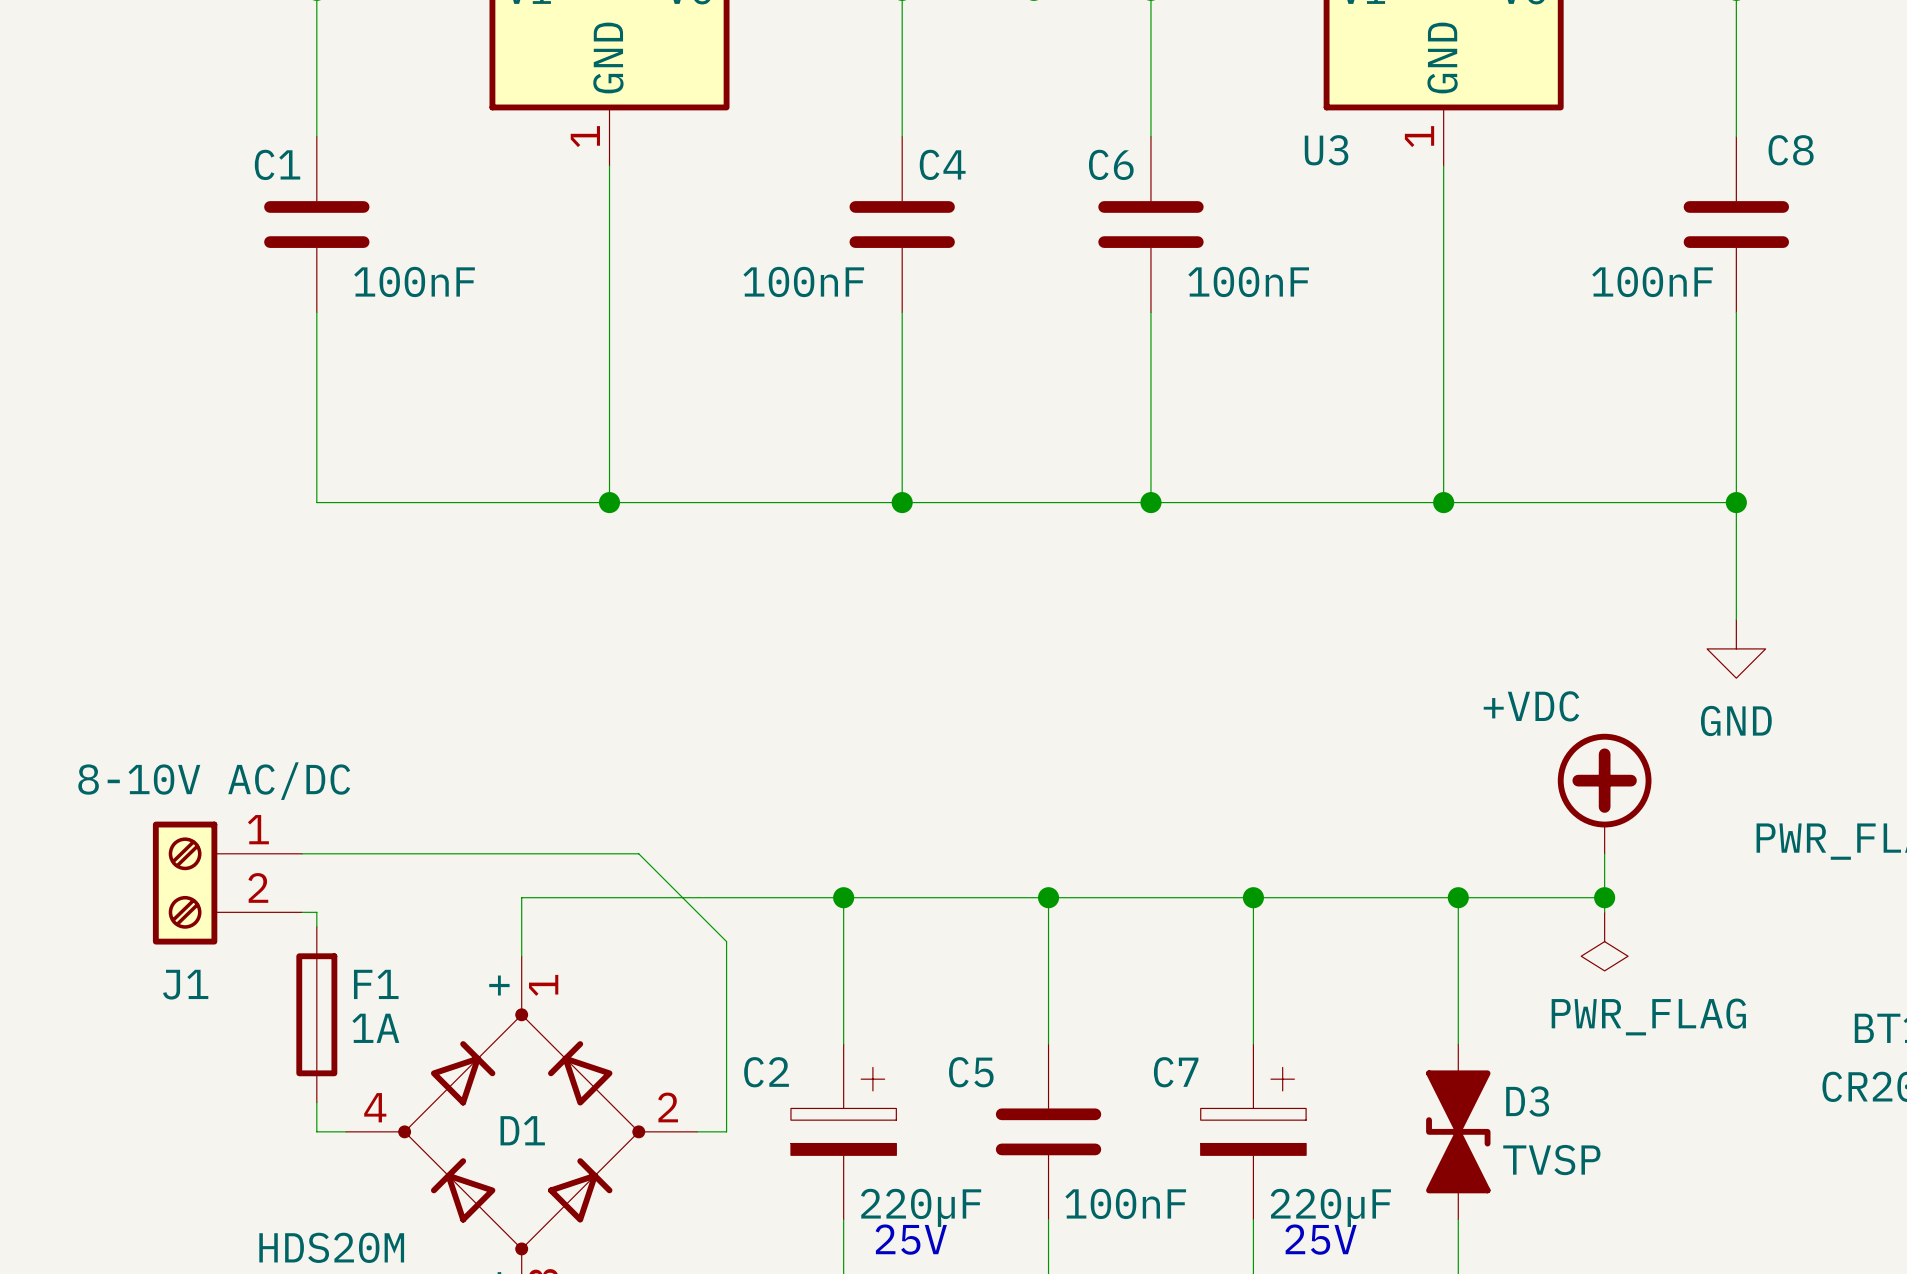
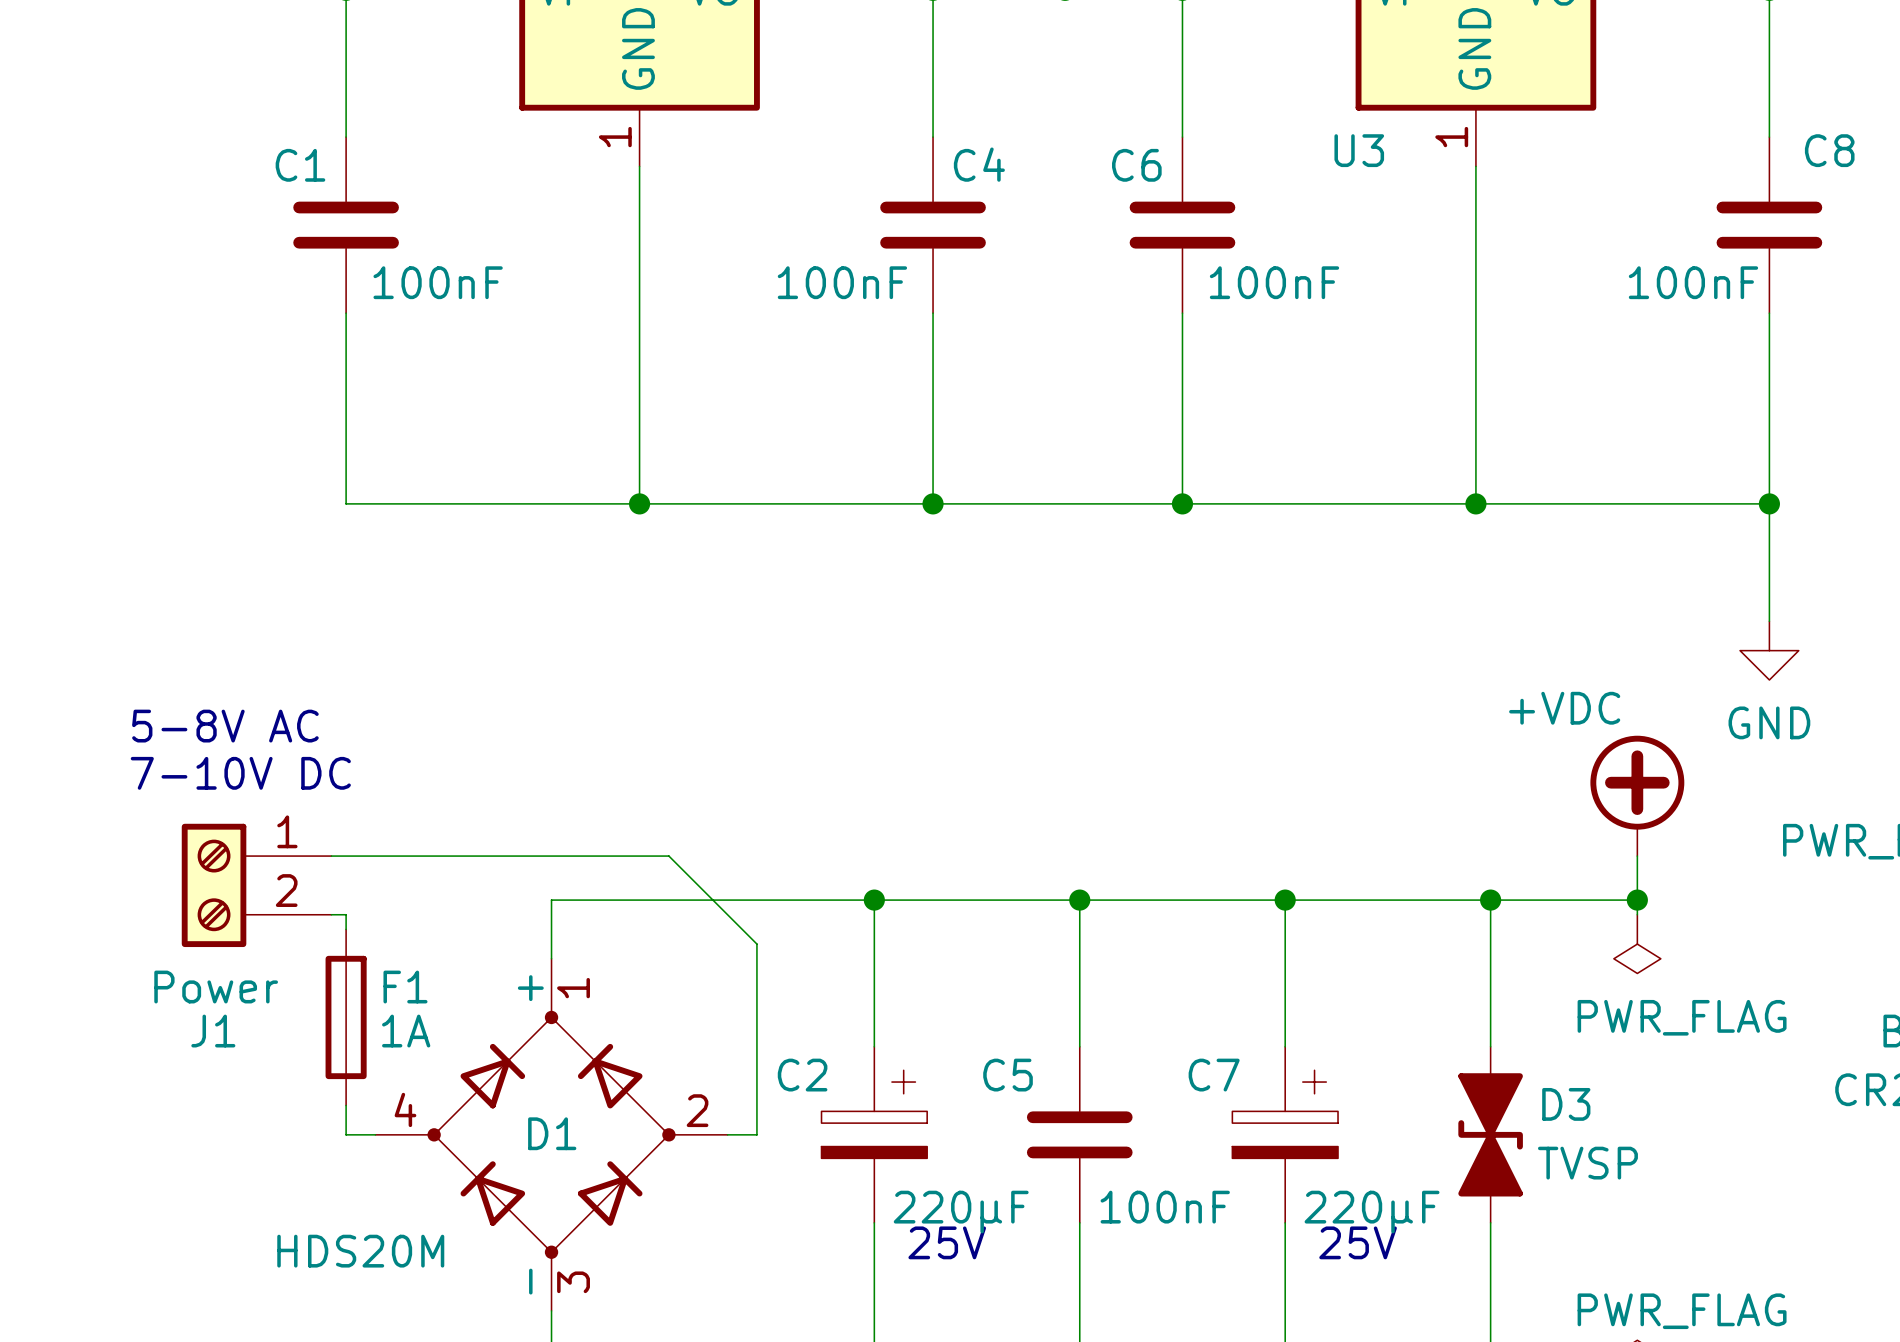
text: none -> 5-8V AC (225, 726)
text: none -> 7-10V DC (240, 773)
J1 value: 8-10V AC/DC (214, 781) -> Power (216, 987)
J1 name position: J1 (185, 984) -> J1 (213, 1031)

